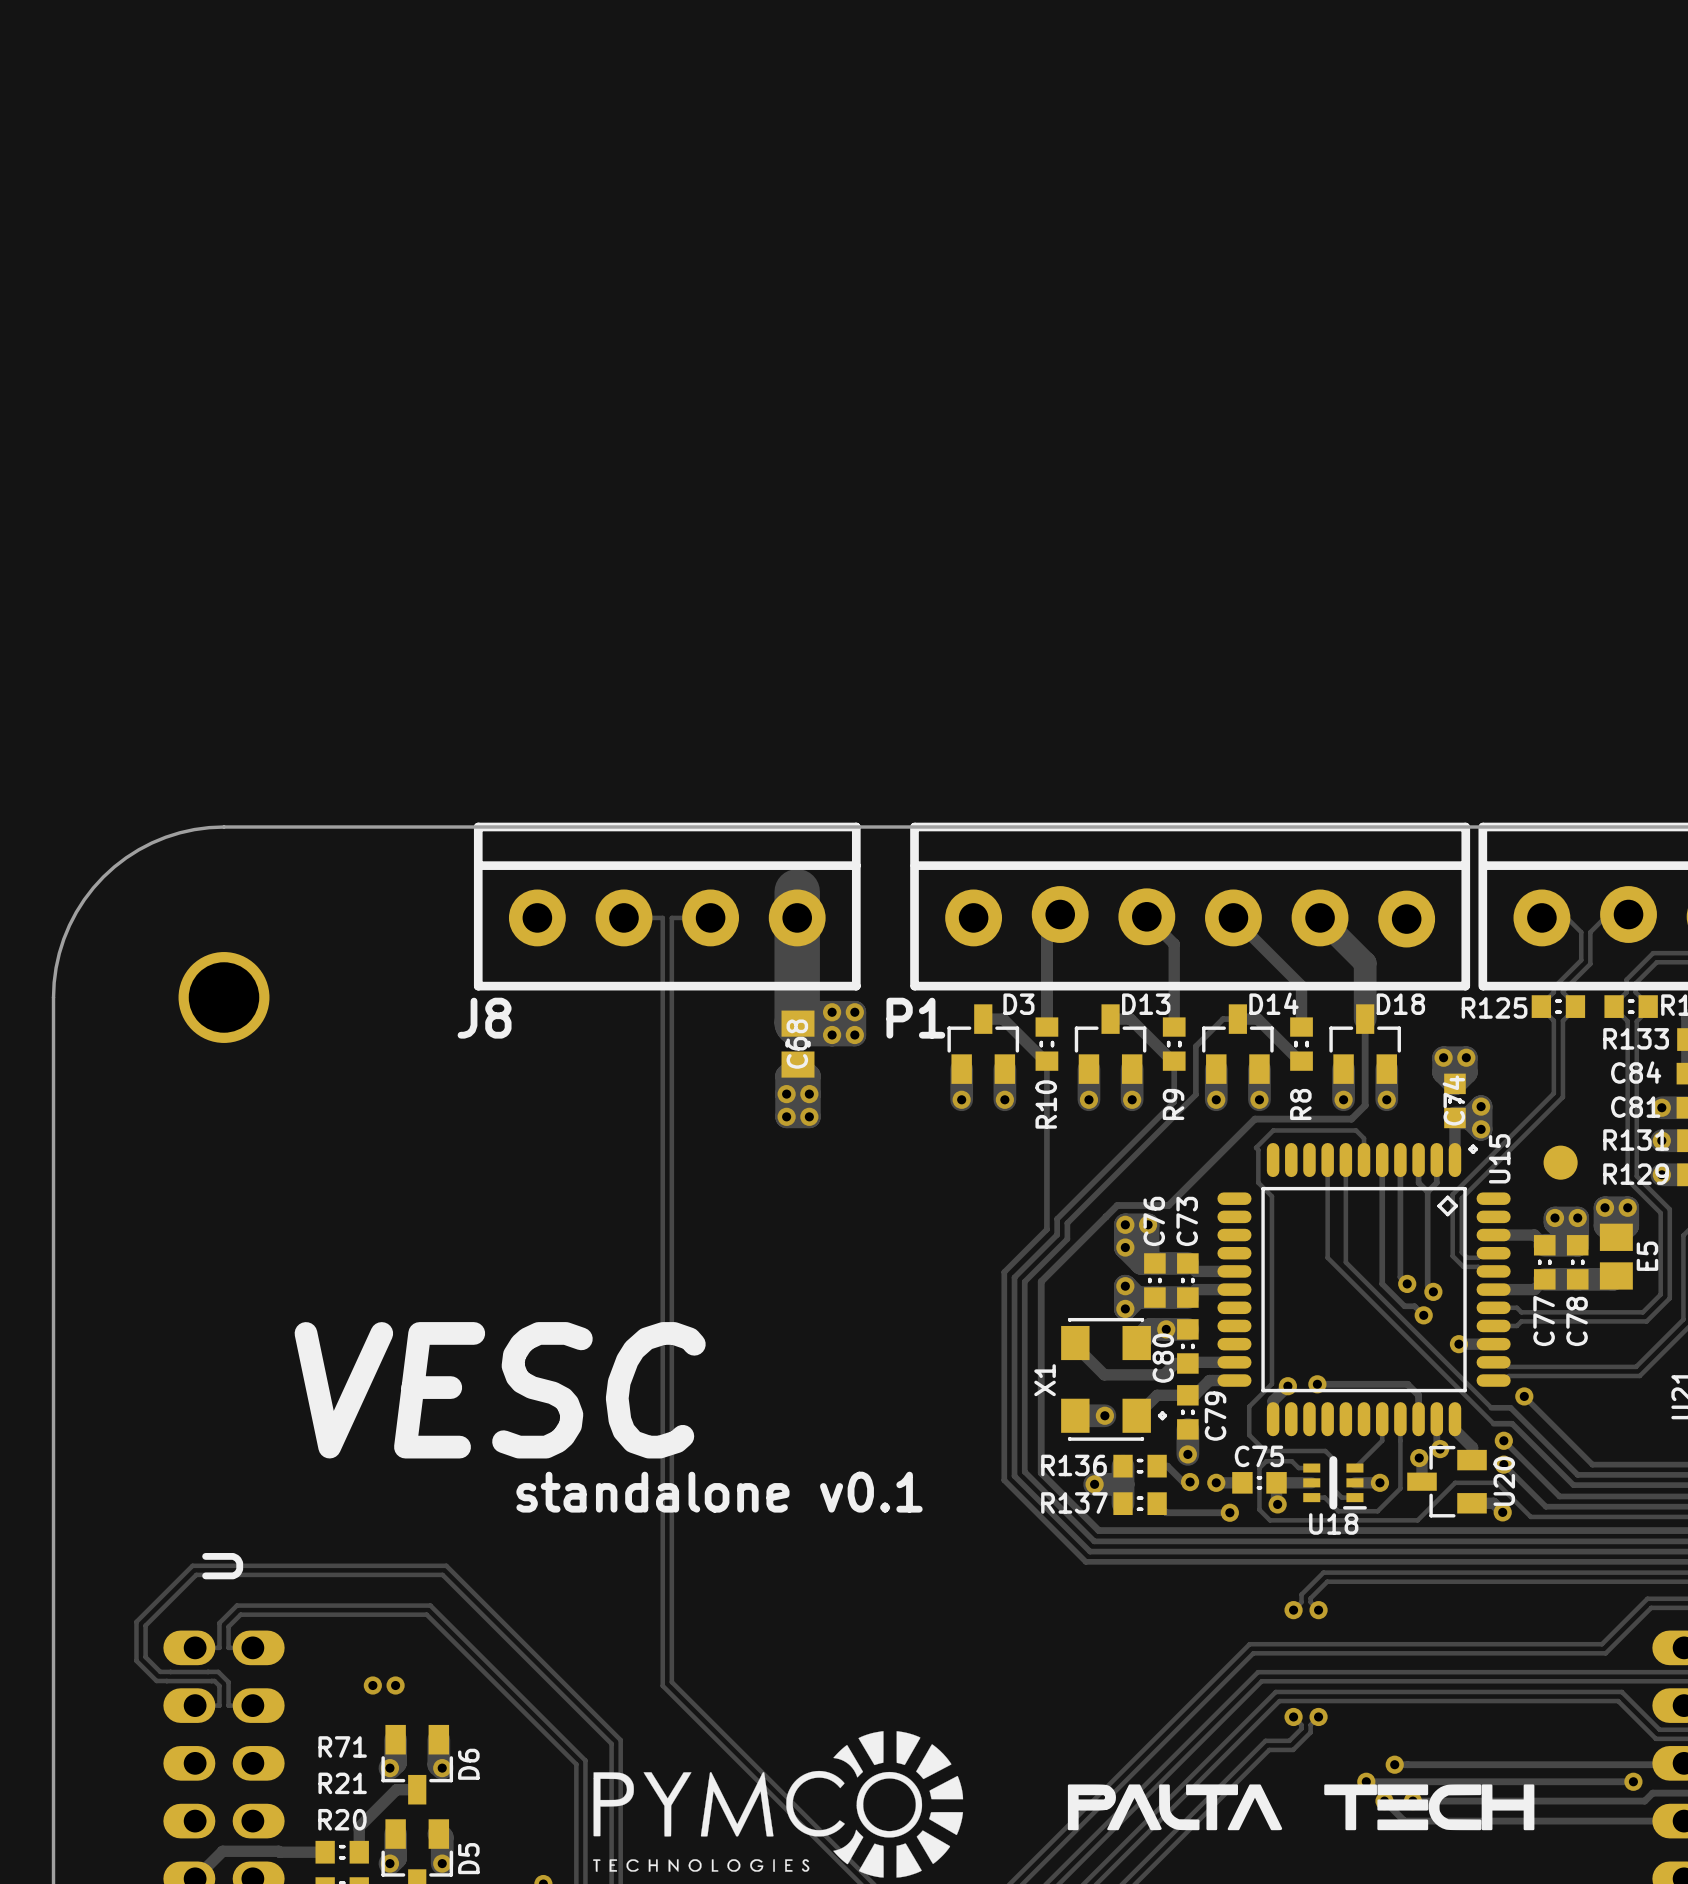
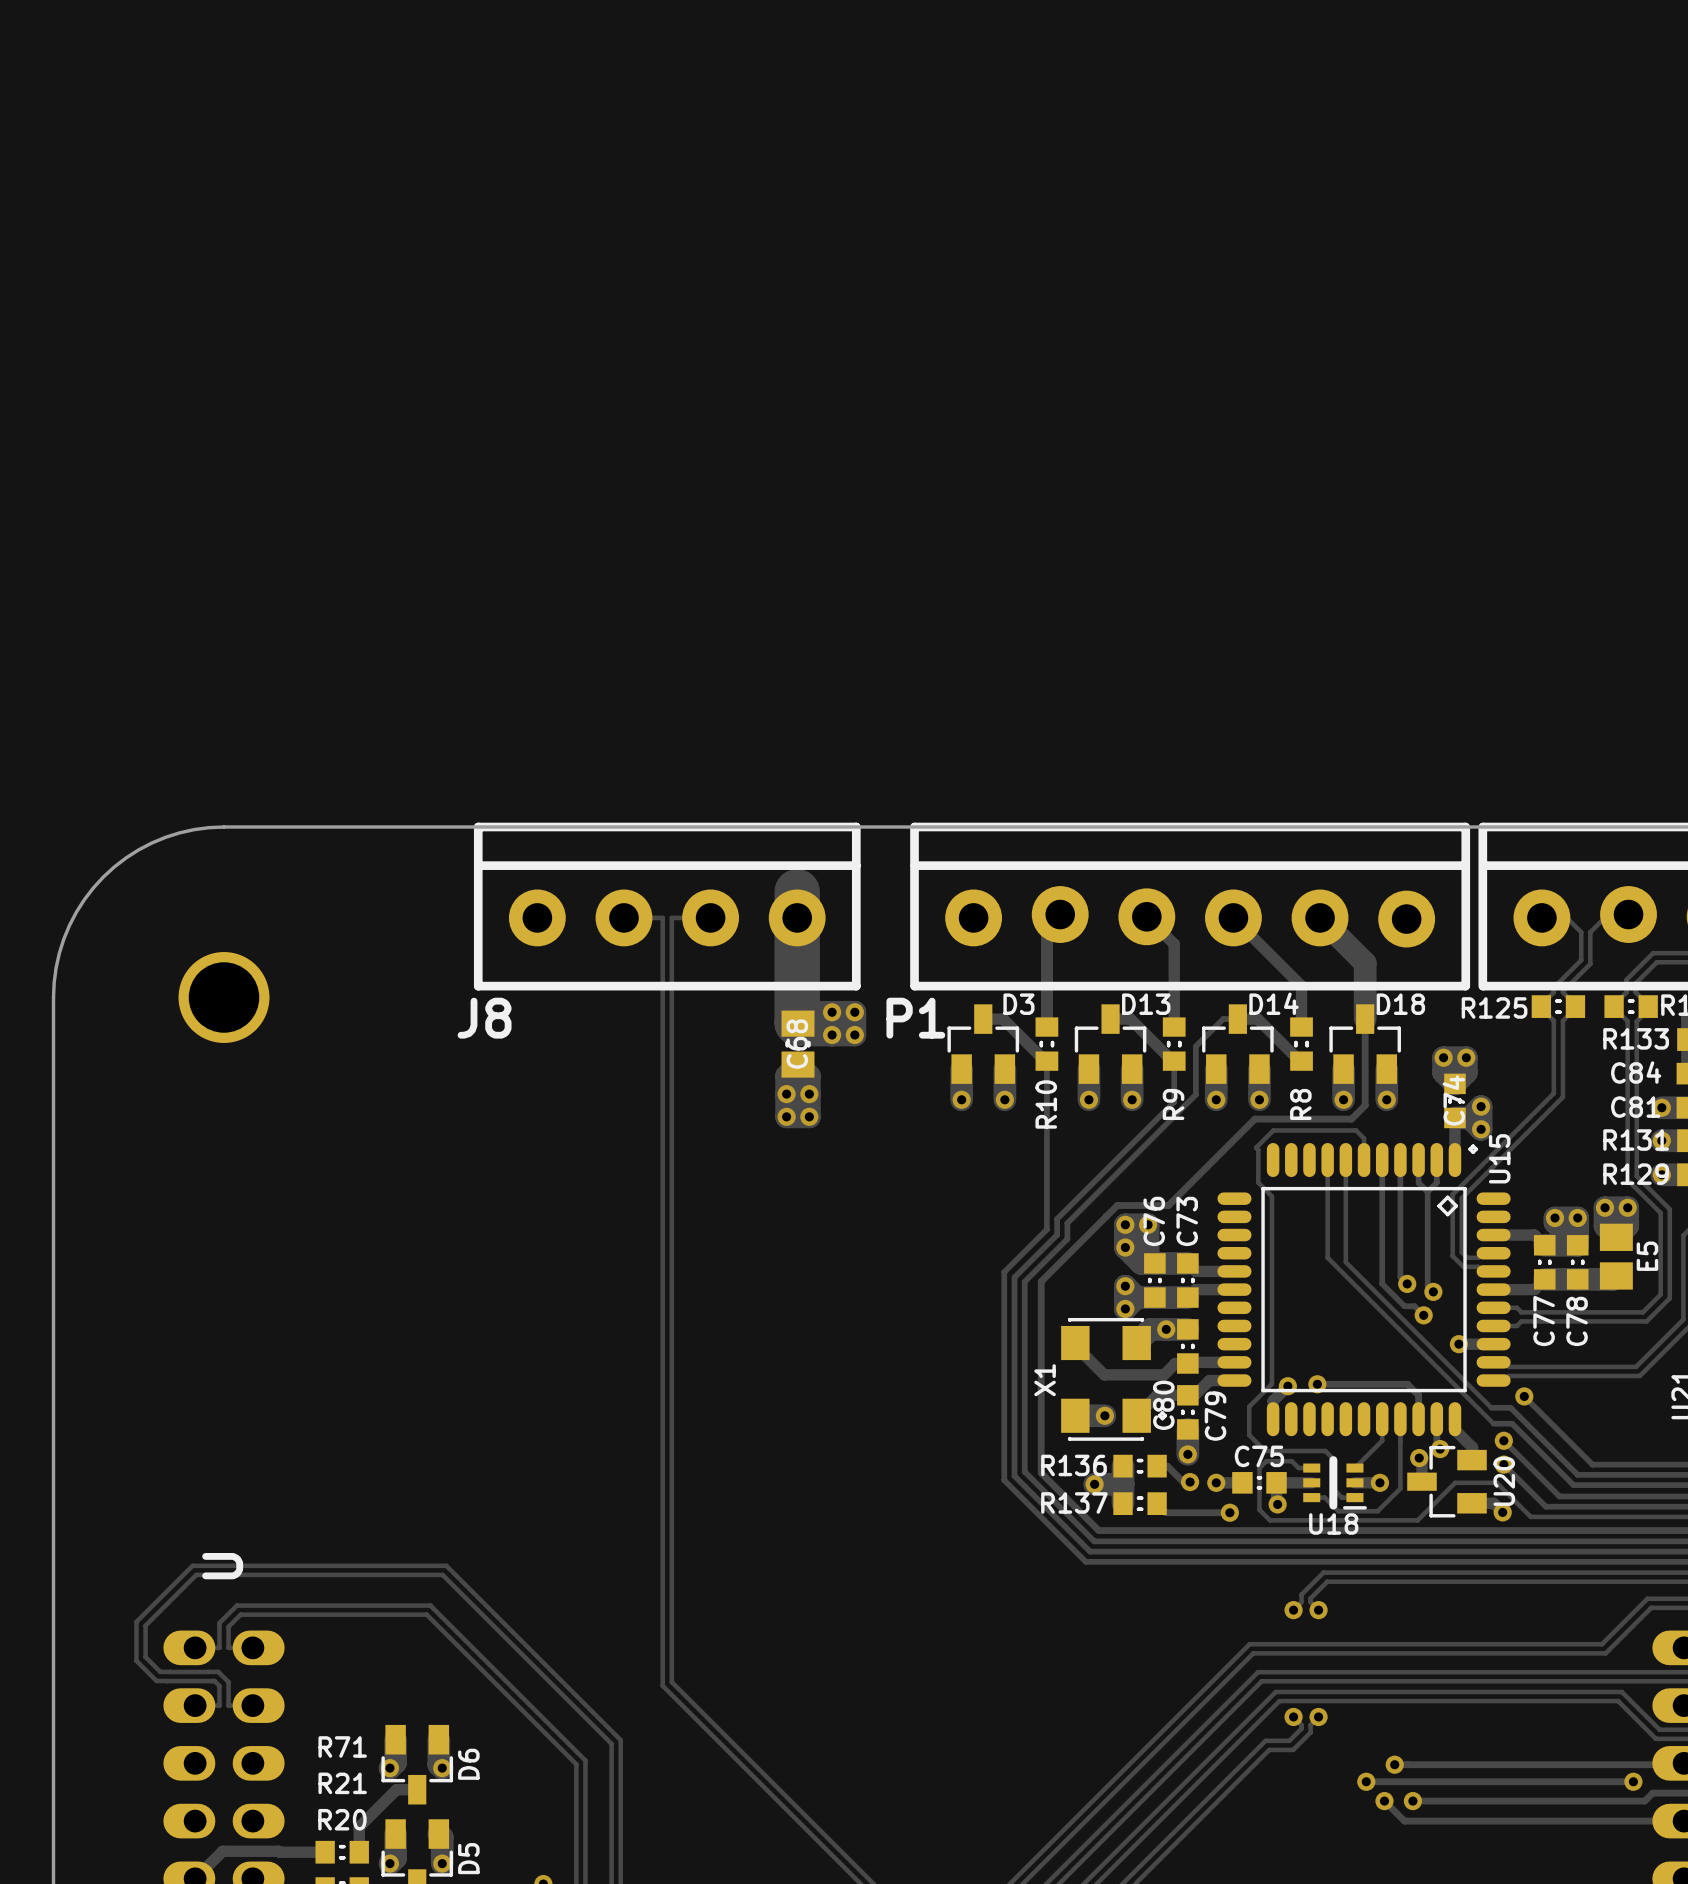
part: (1560, 1162) -> none
C80 name position: C80 (1163, 1358) -> C80 (1163, 1405)
text: VESC (500, 1390) -> none
text: standalone v0.1 (719, 1492) -> none
via: (372, 1685) -> none
via: (395, 1685) -> none
drawing: [593, 1731, 964, 1878] -> none
drawing: [1067, 1784, 1535, 1831] -> none

